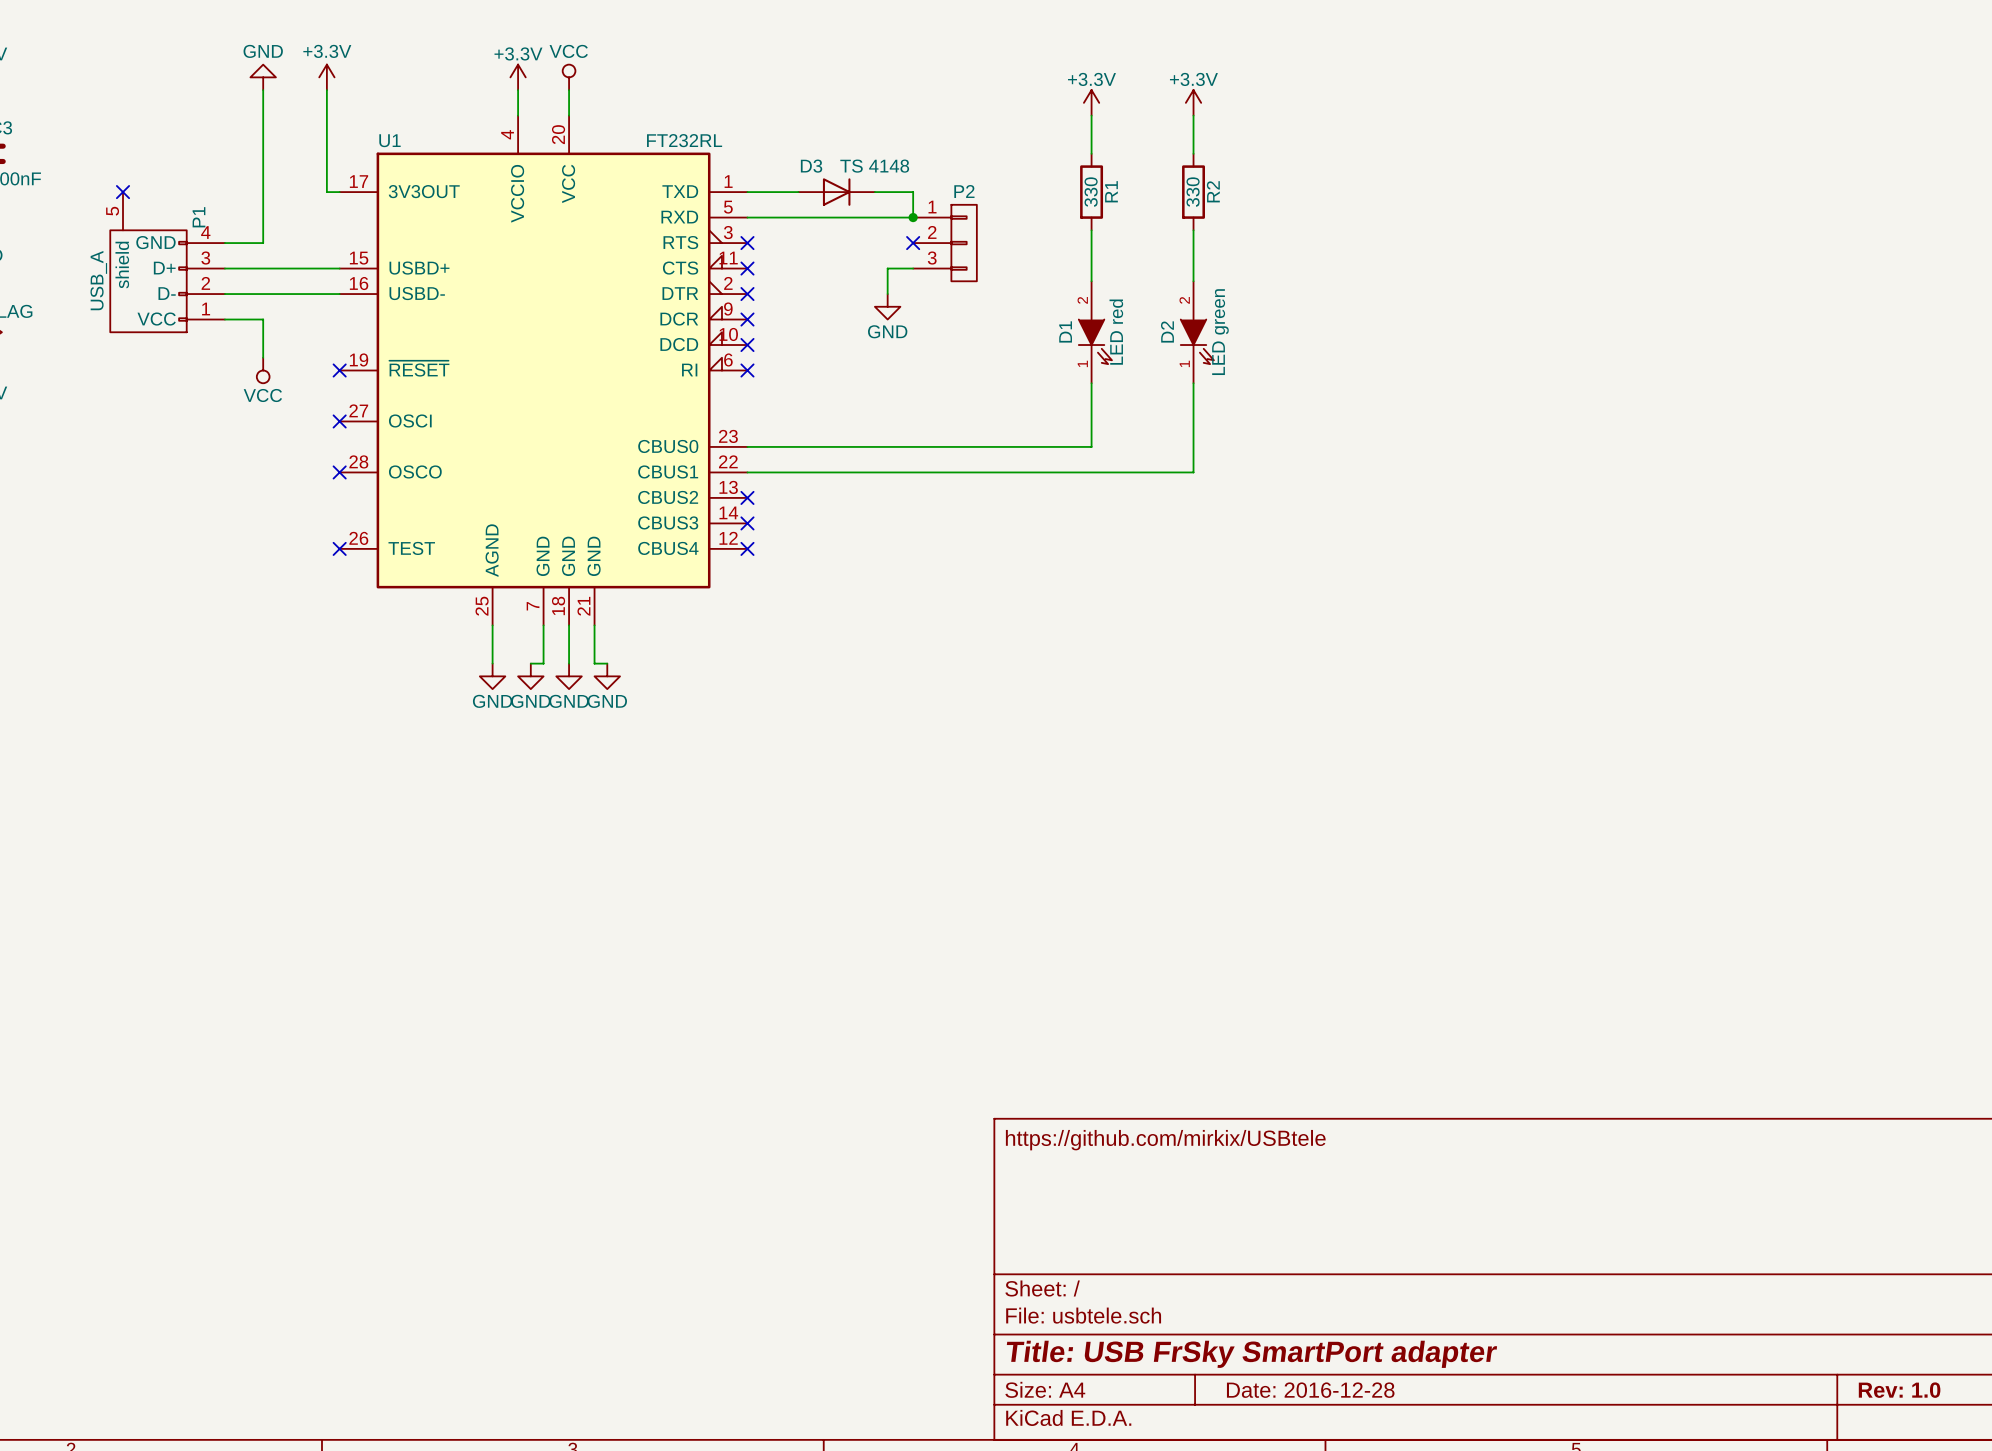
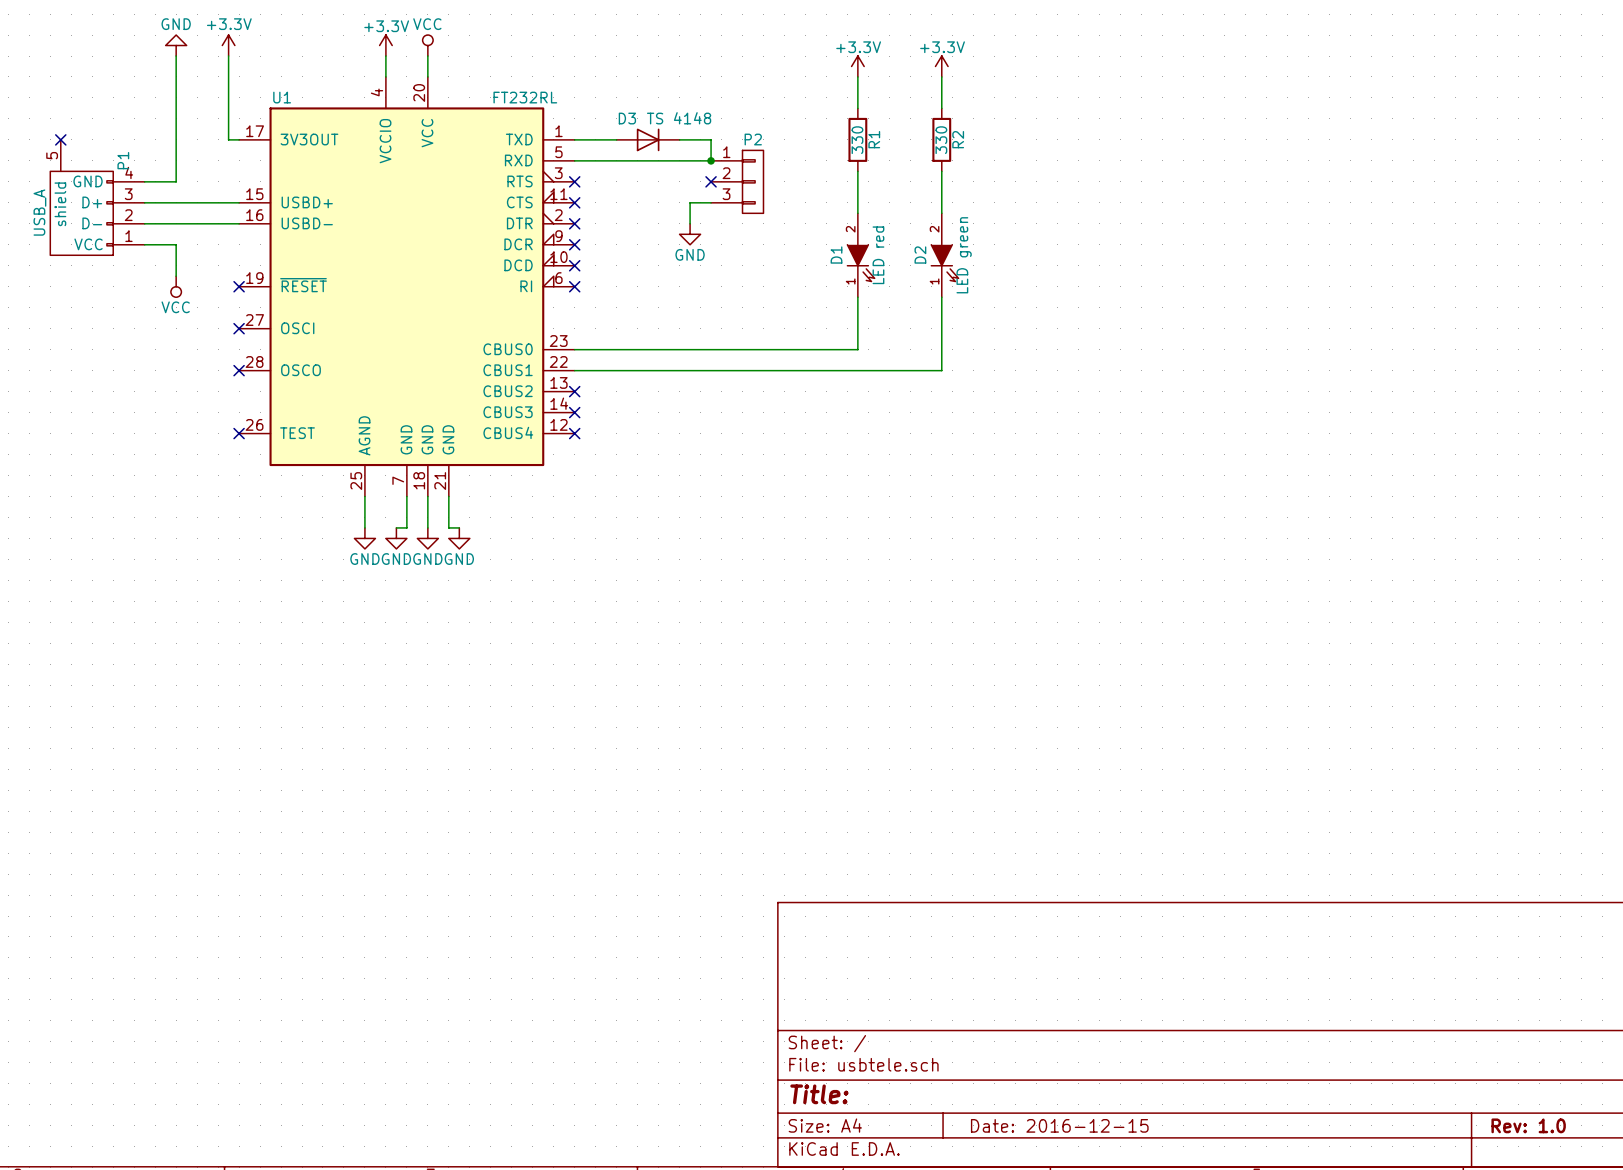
title block: https://github.com/mirkix/USBtele (1165, 1140) -> none
title block: Title: USB FrSky SmartPort adapter (1251, 1354) -> Title: (819, 1094)
title block: Date: 2016-12-28 (1310, 1390) -> Date: 2016-12-15 (1059, 1125)

